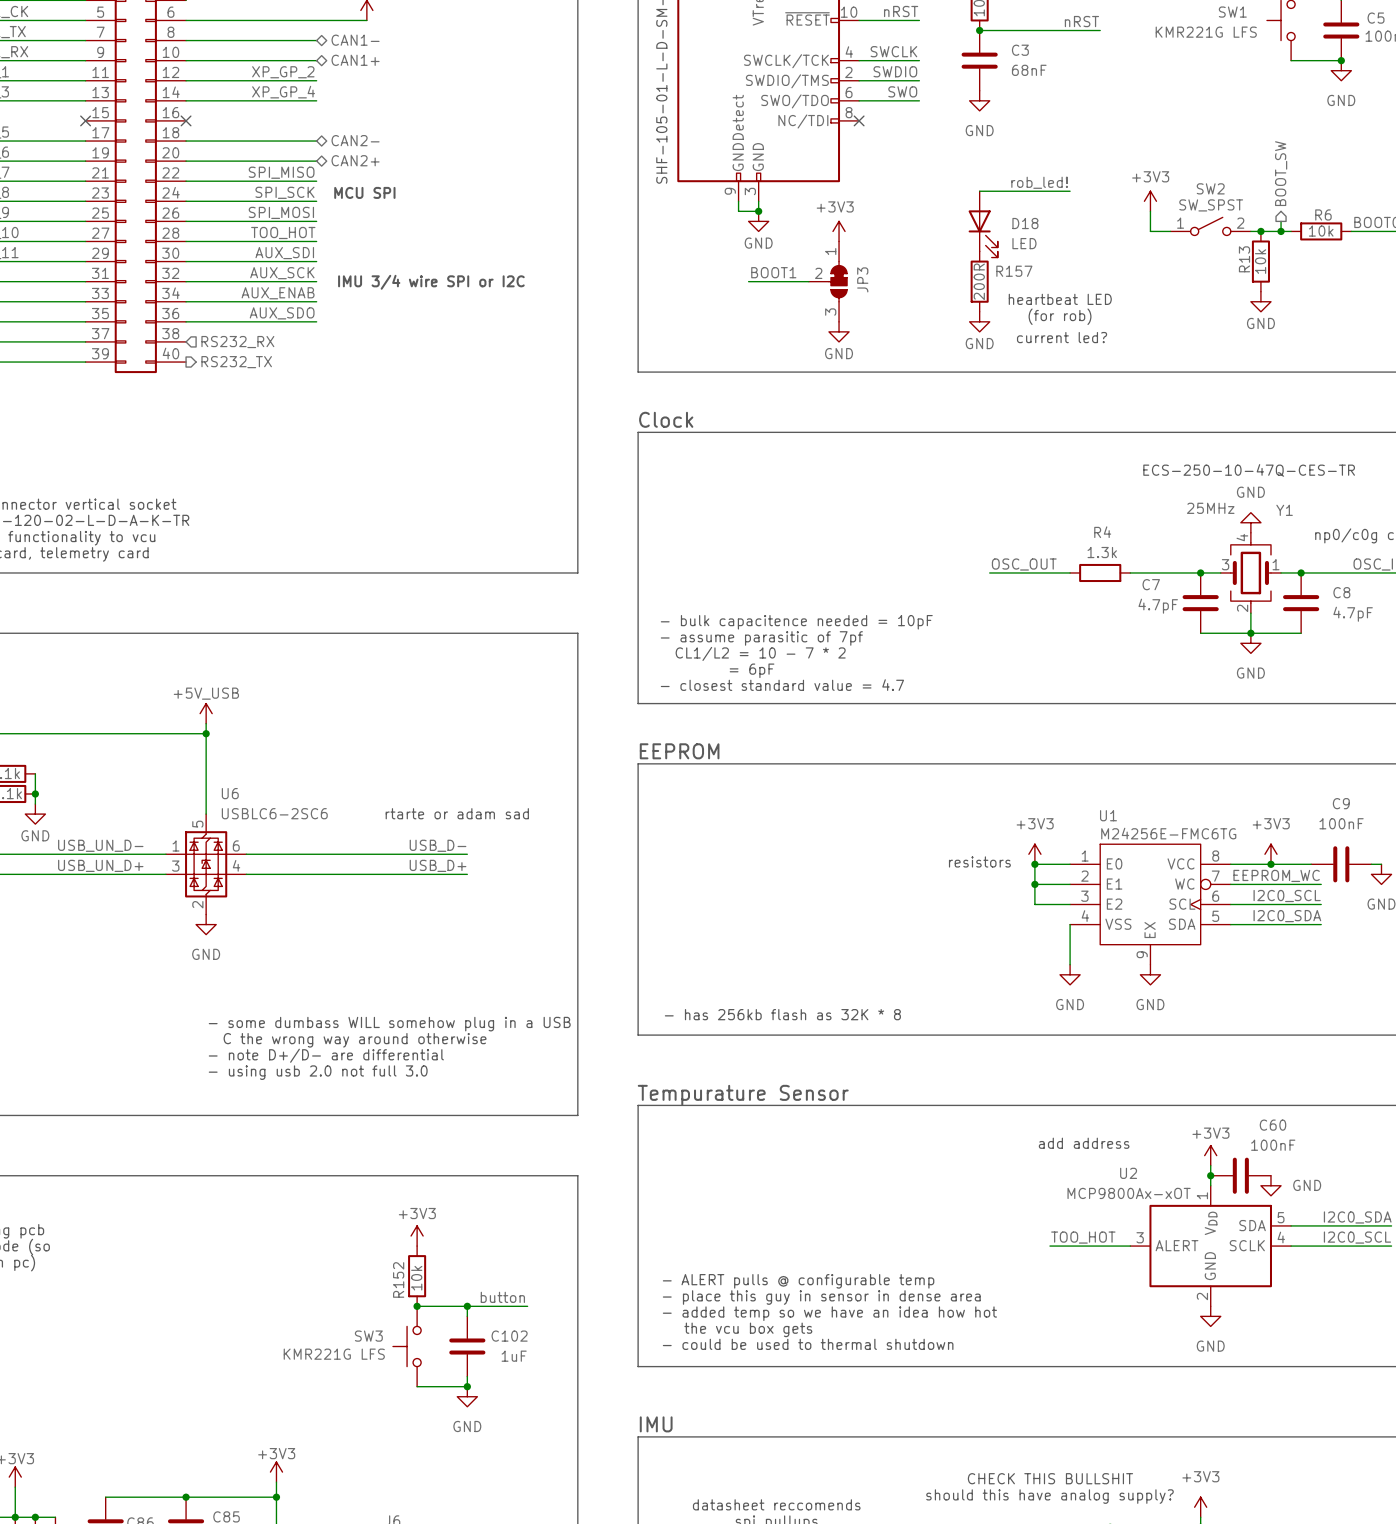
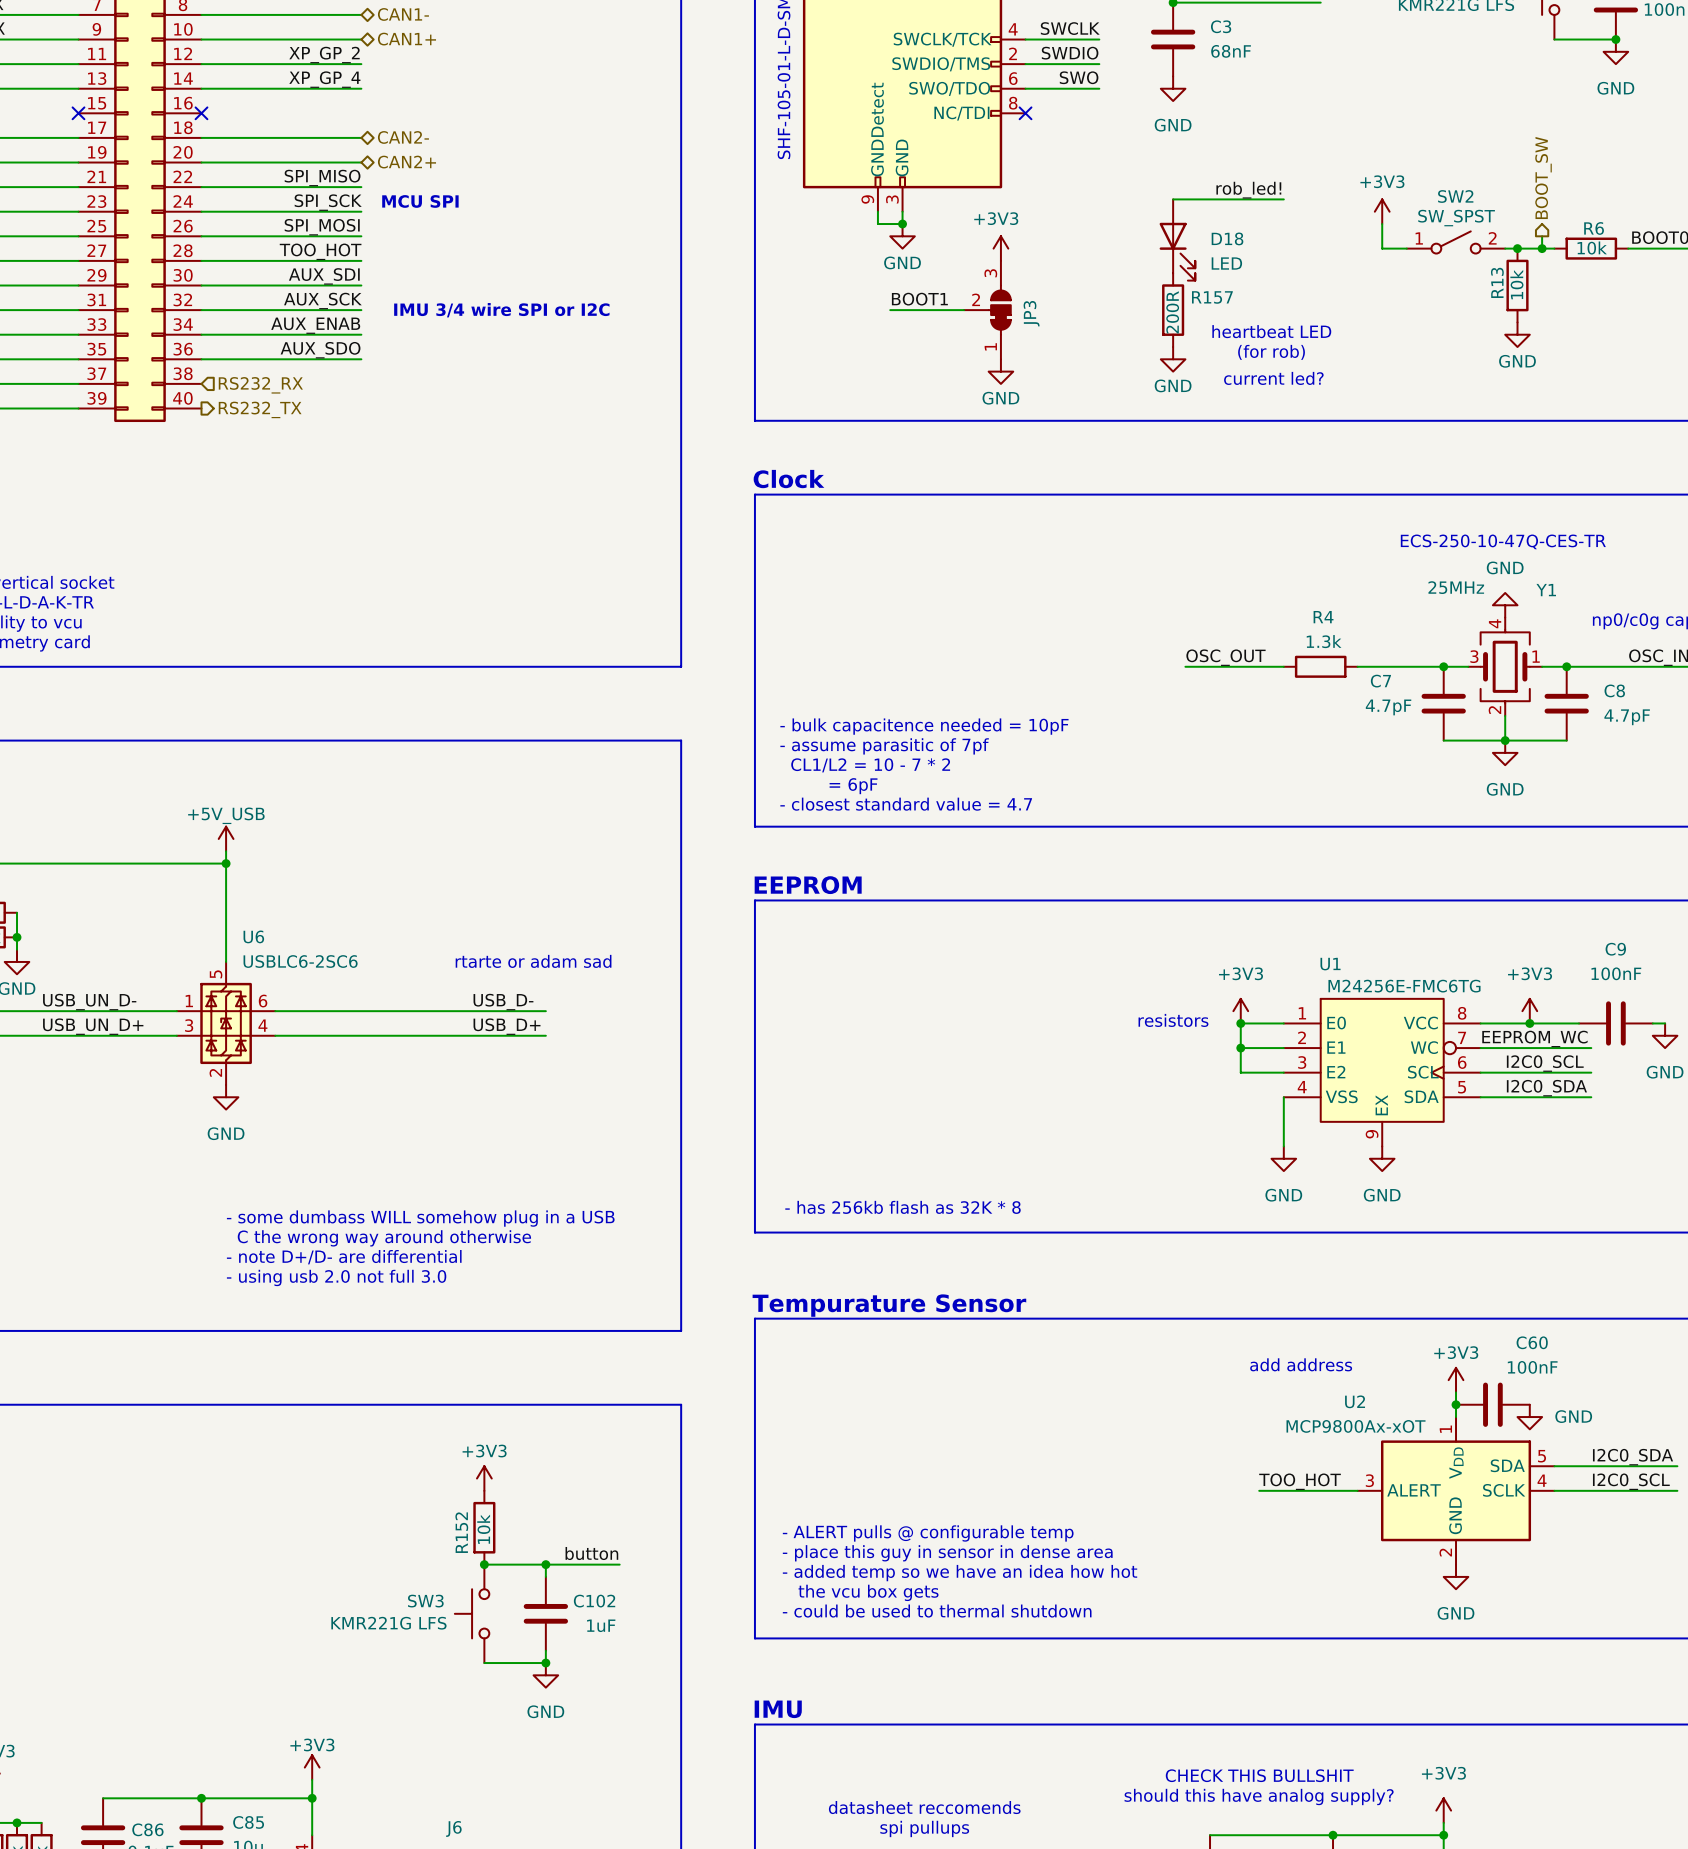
JP3 flip: as is (838, 281) -> up-down (999, 310)

